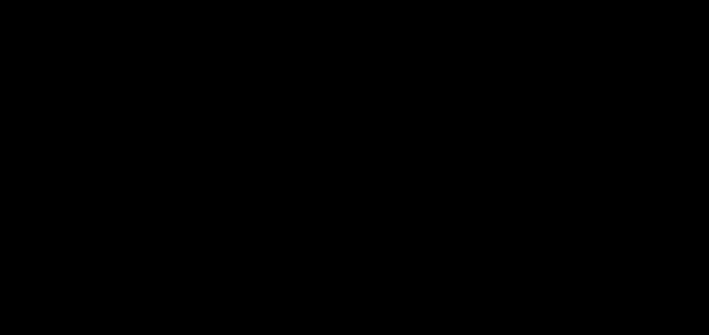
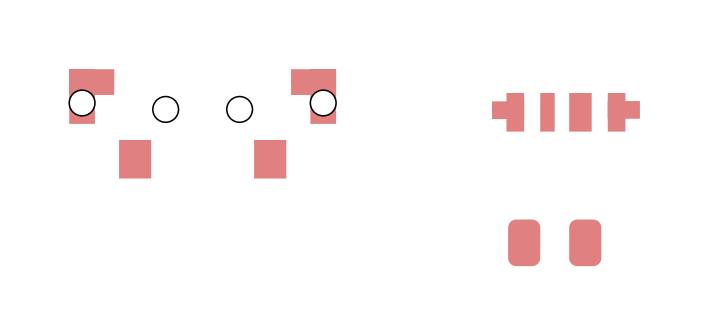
part: none -> (565, 112)
part: none -> (202, 123)
part: none -> (554, 242)

